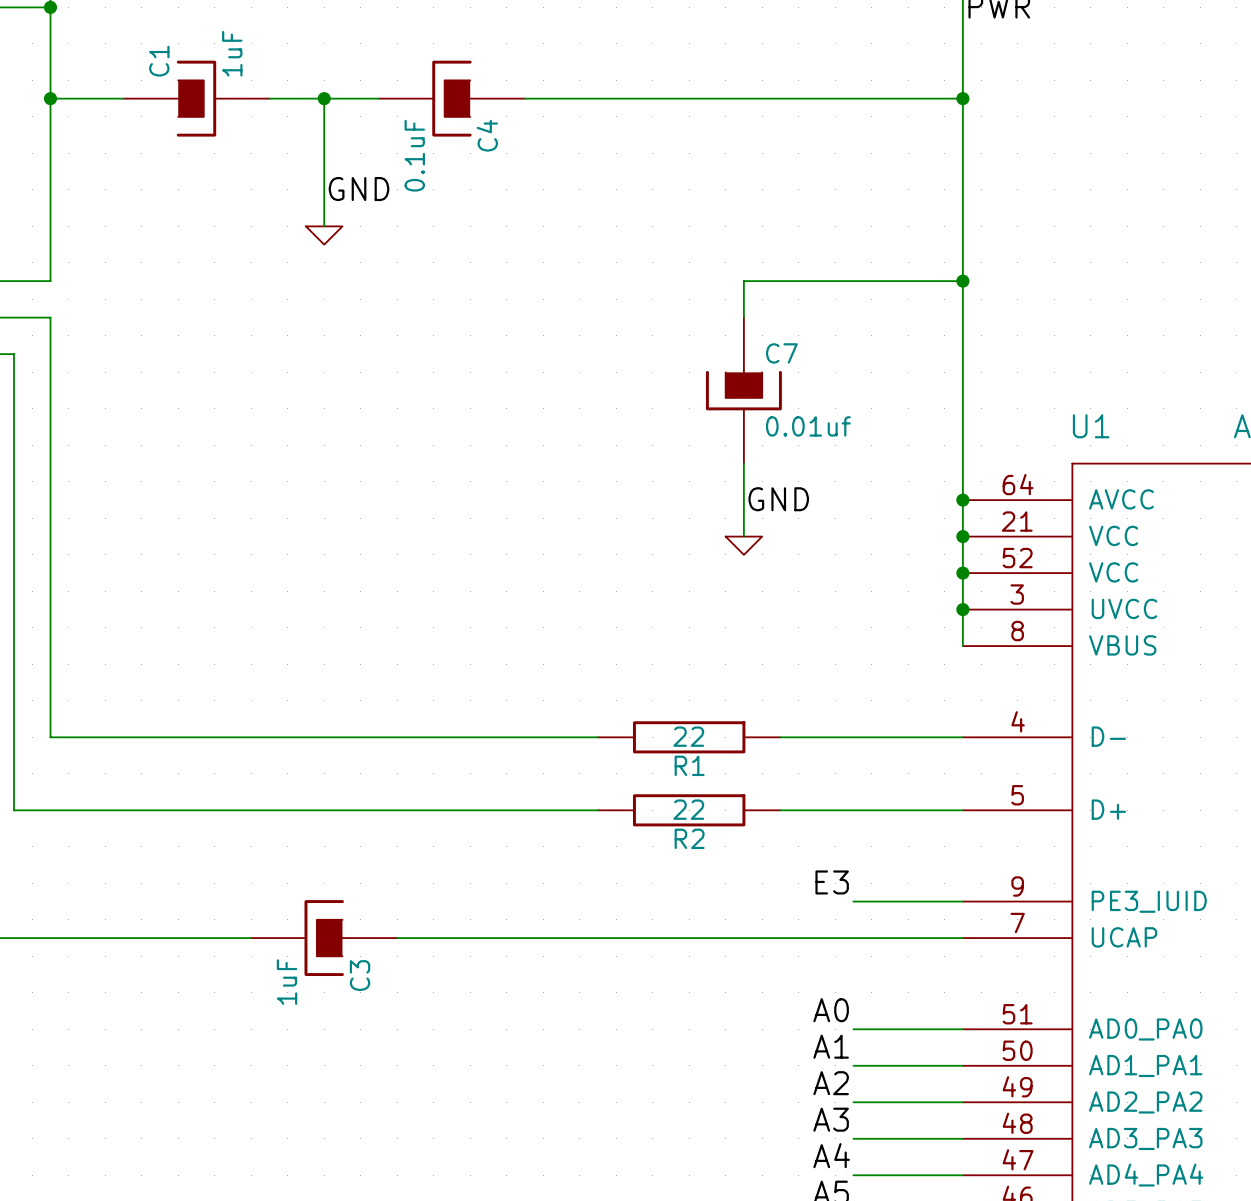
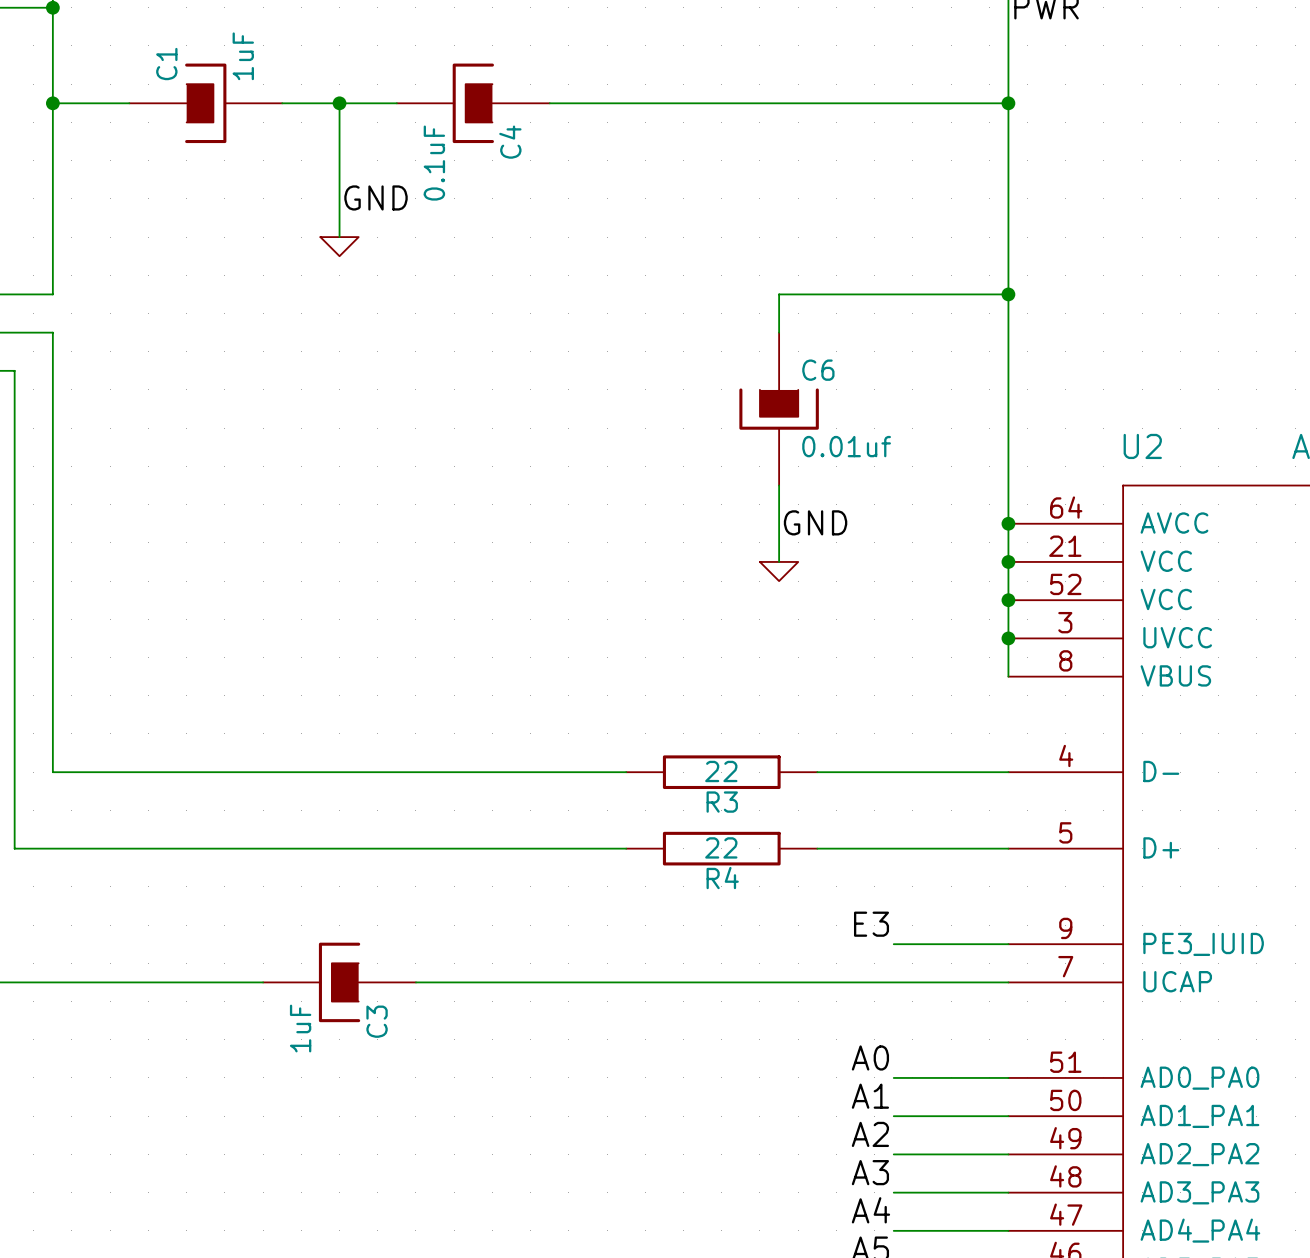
C7 name: C7 (781, 353) -> C6 (818, 370)
U1 name: U1 (1091, 426) -> U2 (1142, 446)
R1 name: R1 (689, 765) -> R3 (722, 802)
R2 name: R2 (689, 838) -> R4 (722, 878)

